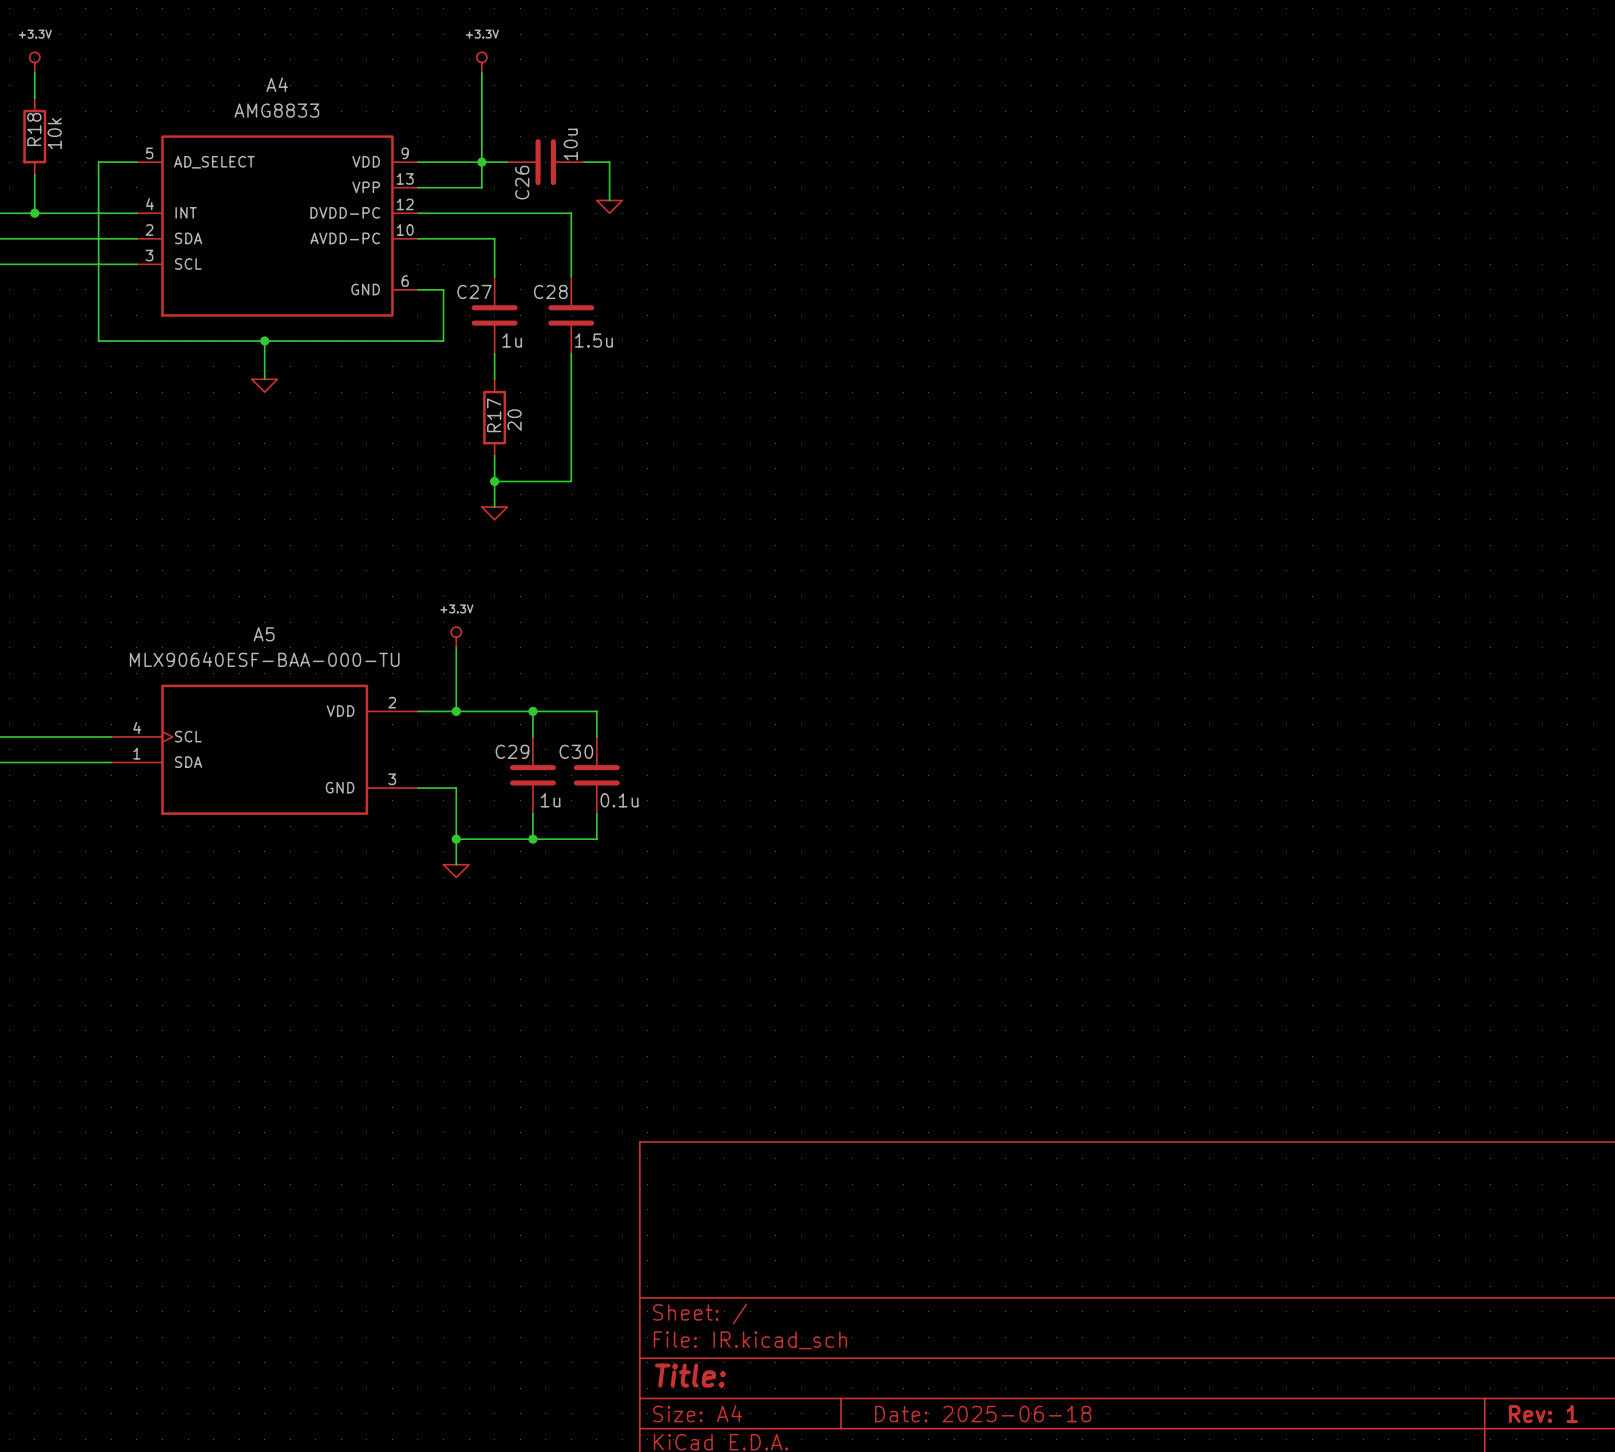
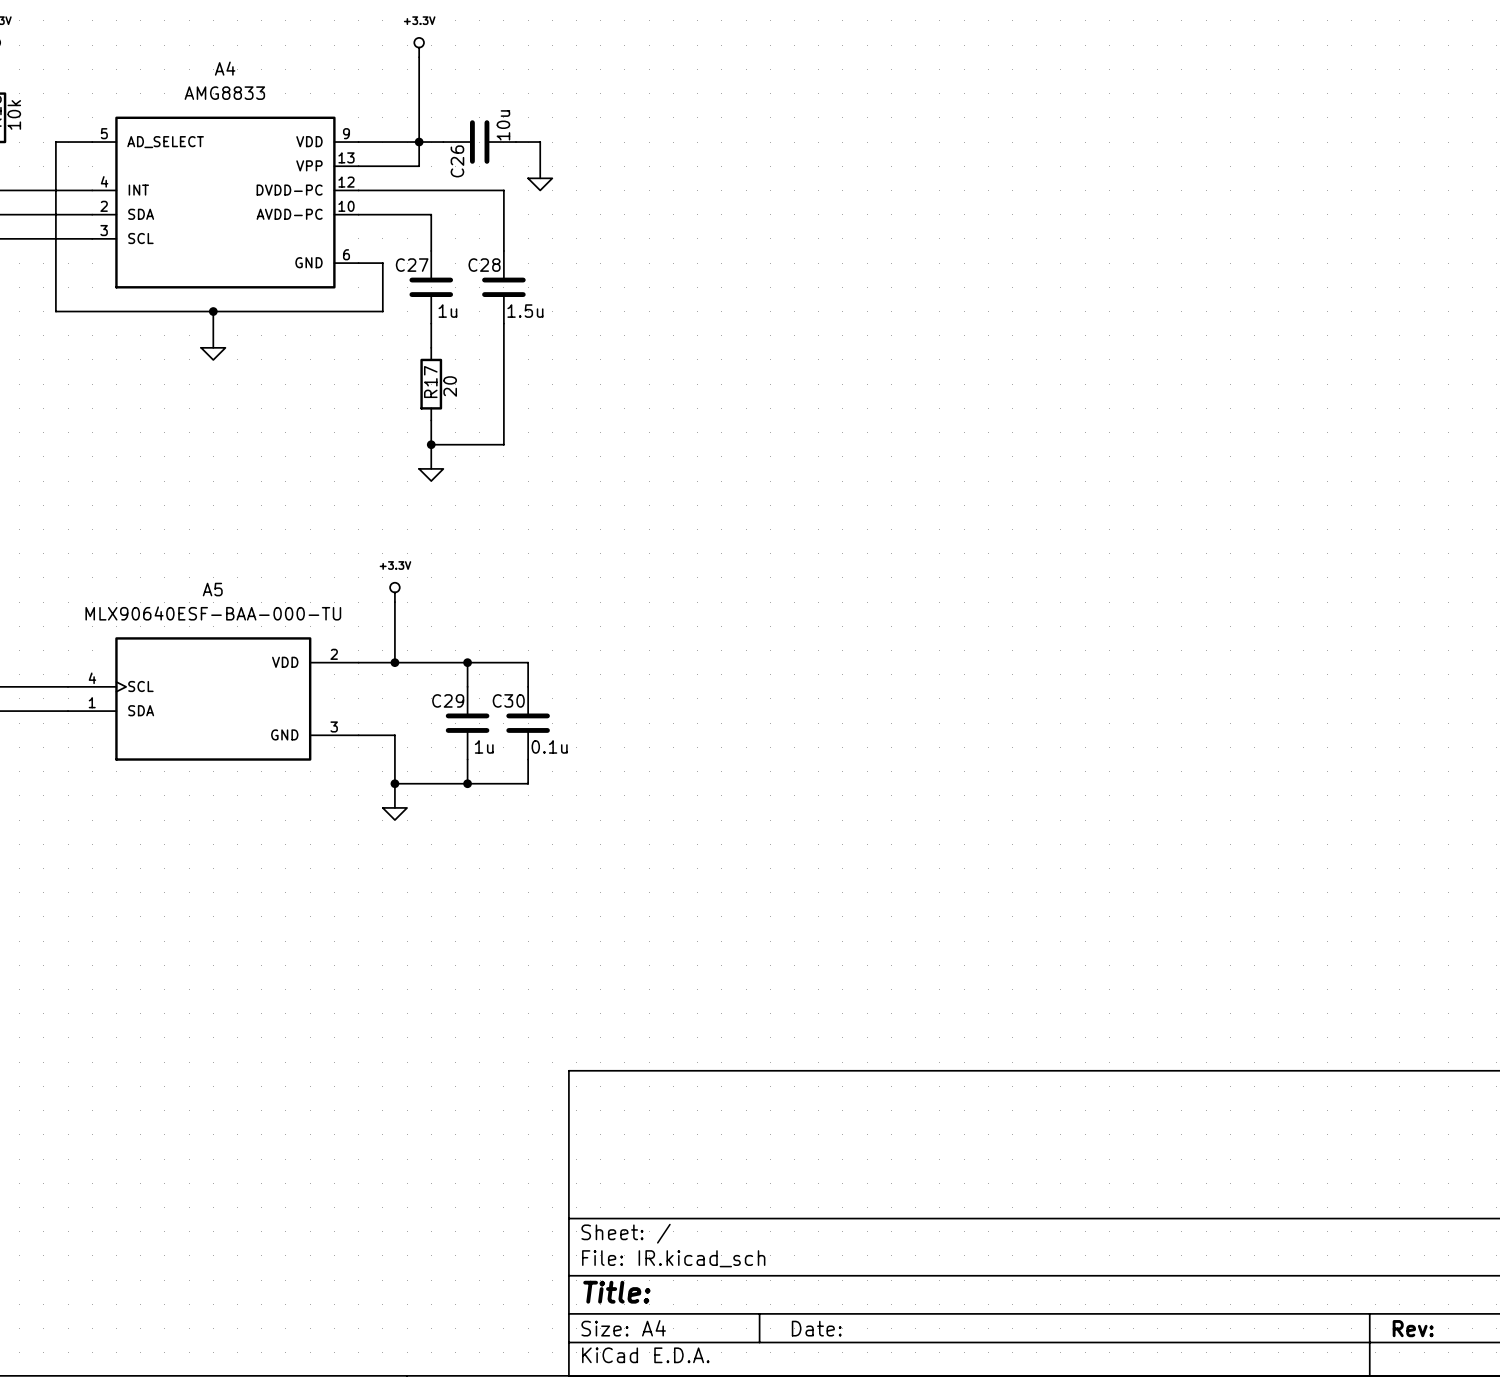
title block: Date: 2025-06-18 (983, 1414) -> Date: (816, 1328)
title block: Rev: 1 (1543, 1414) -> Rev: (1413, 1328)

